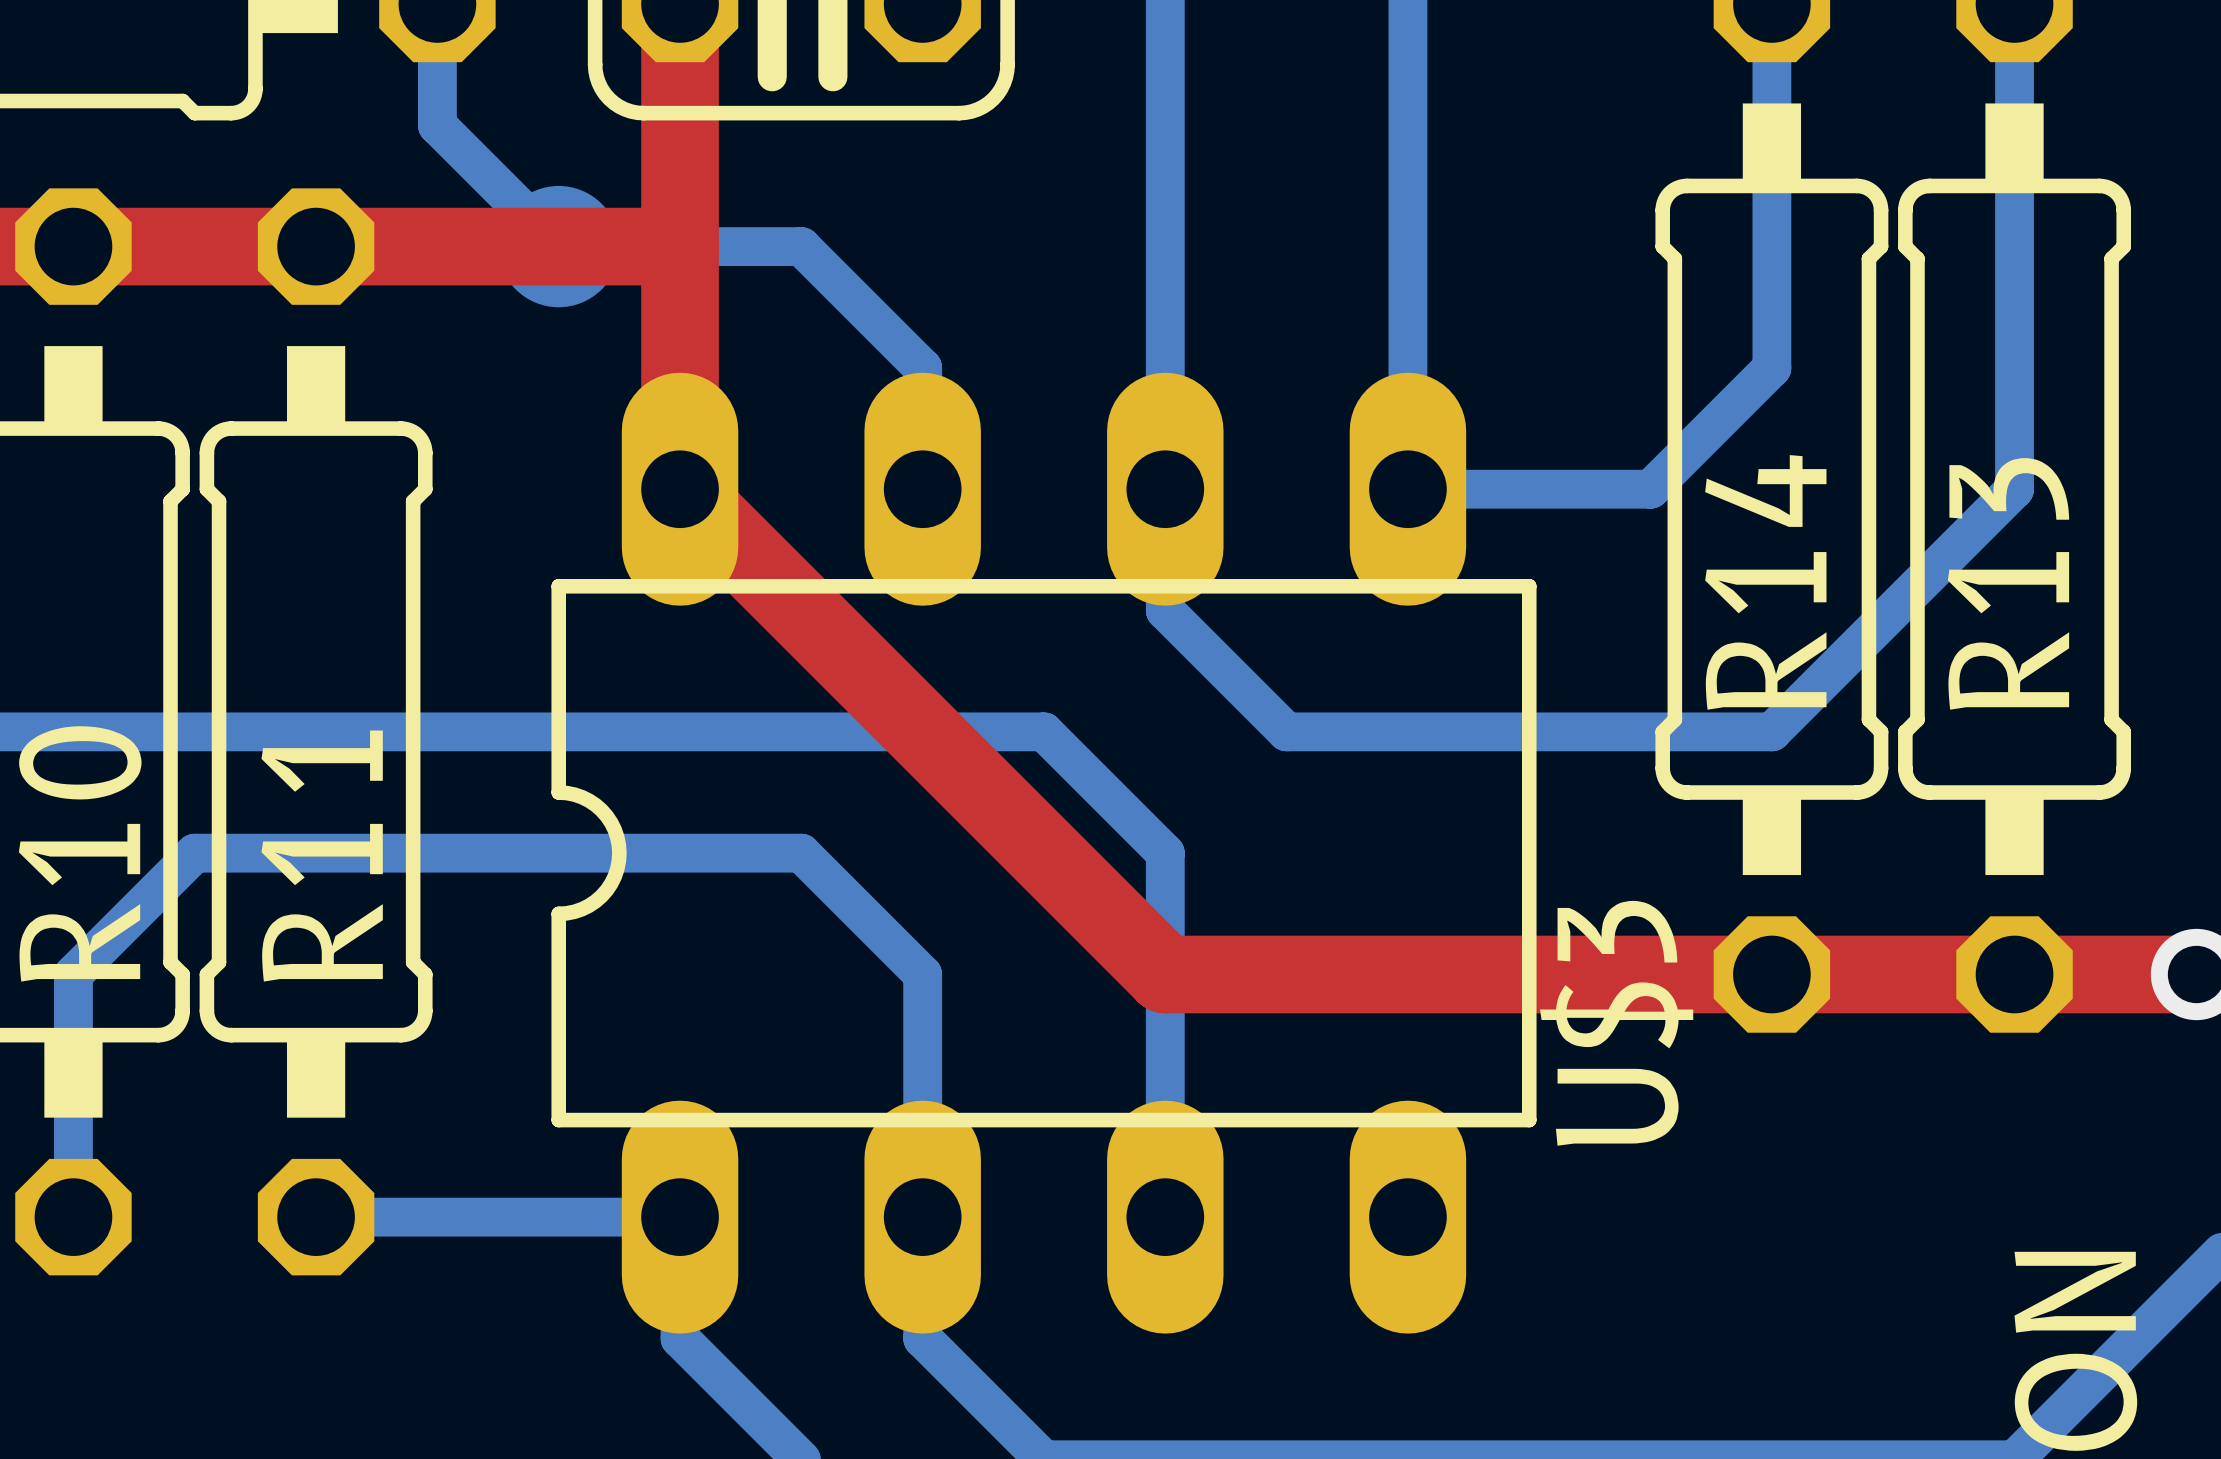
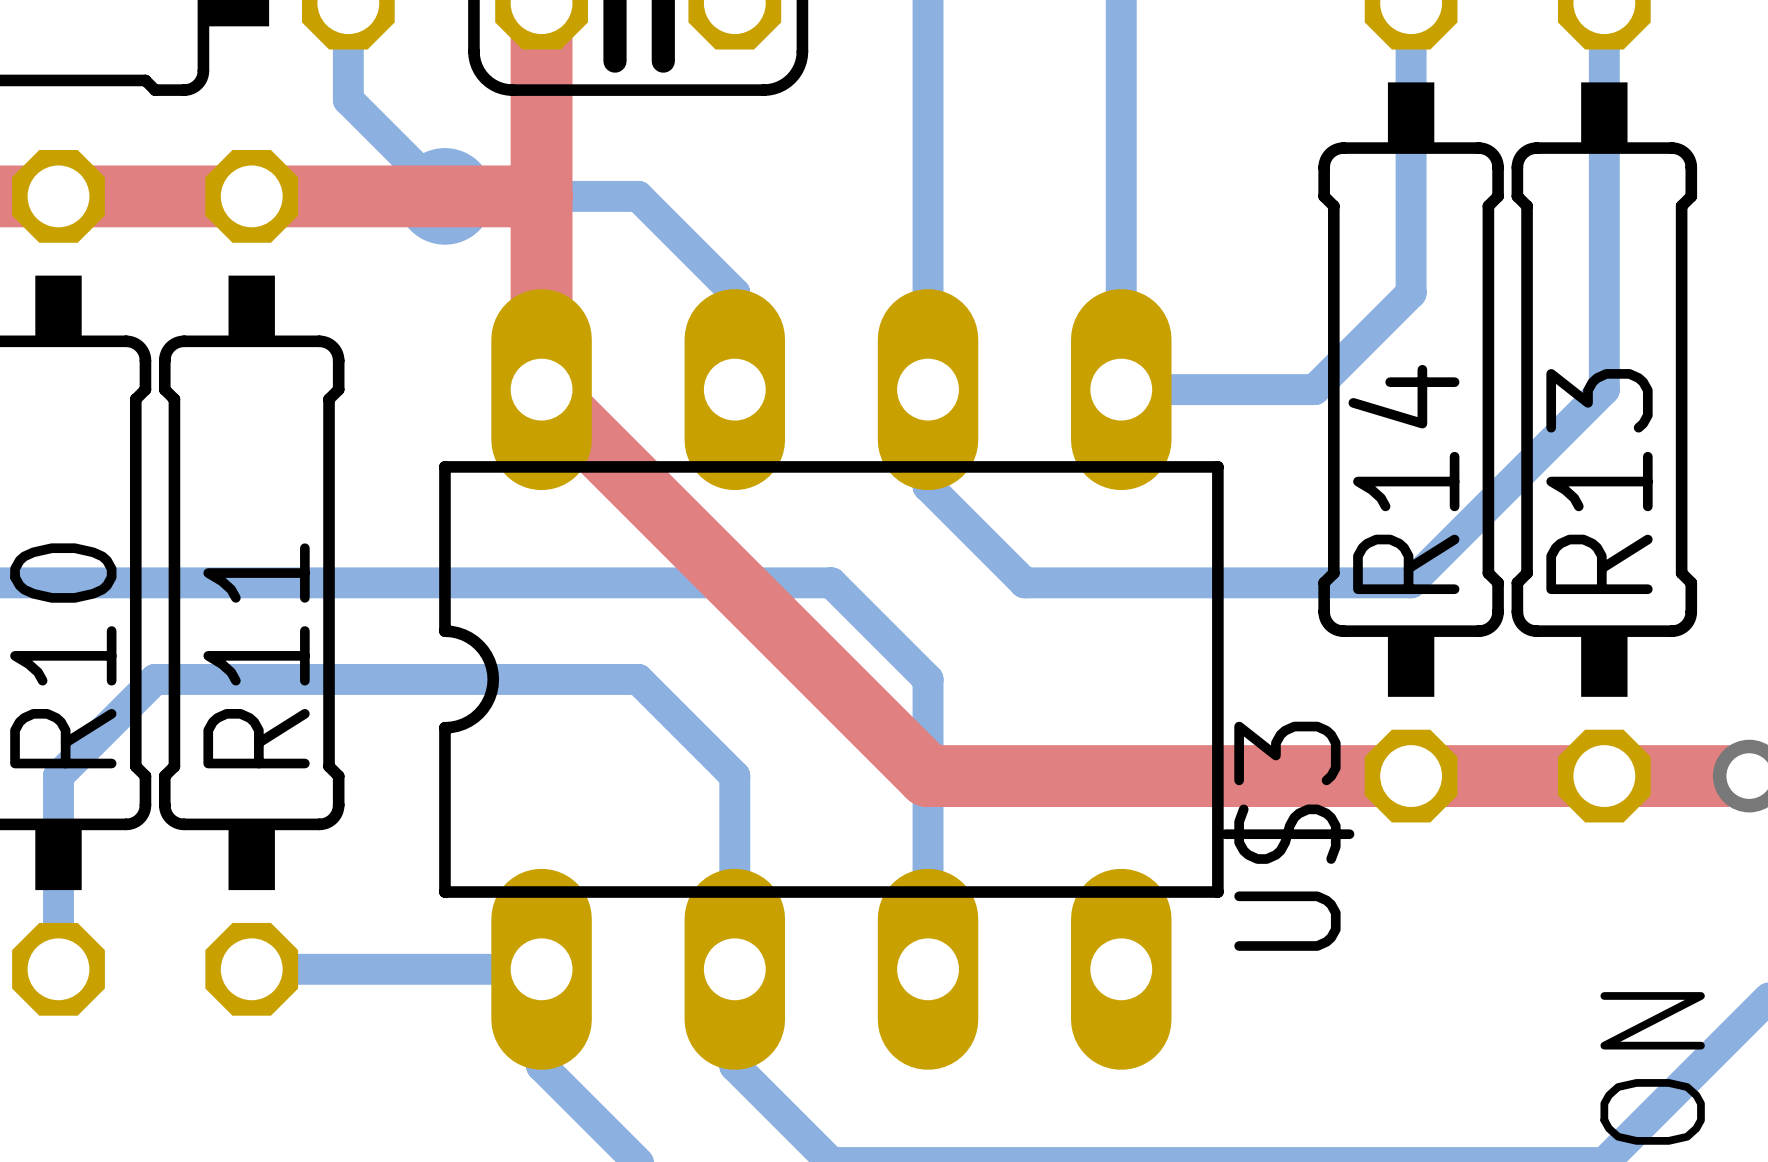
U$3 footprint: [551, 372, 1537, 1334] -> [439, 289, 1224, 1070]

